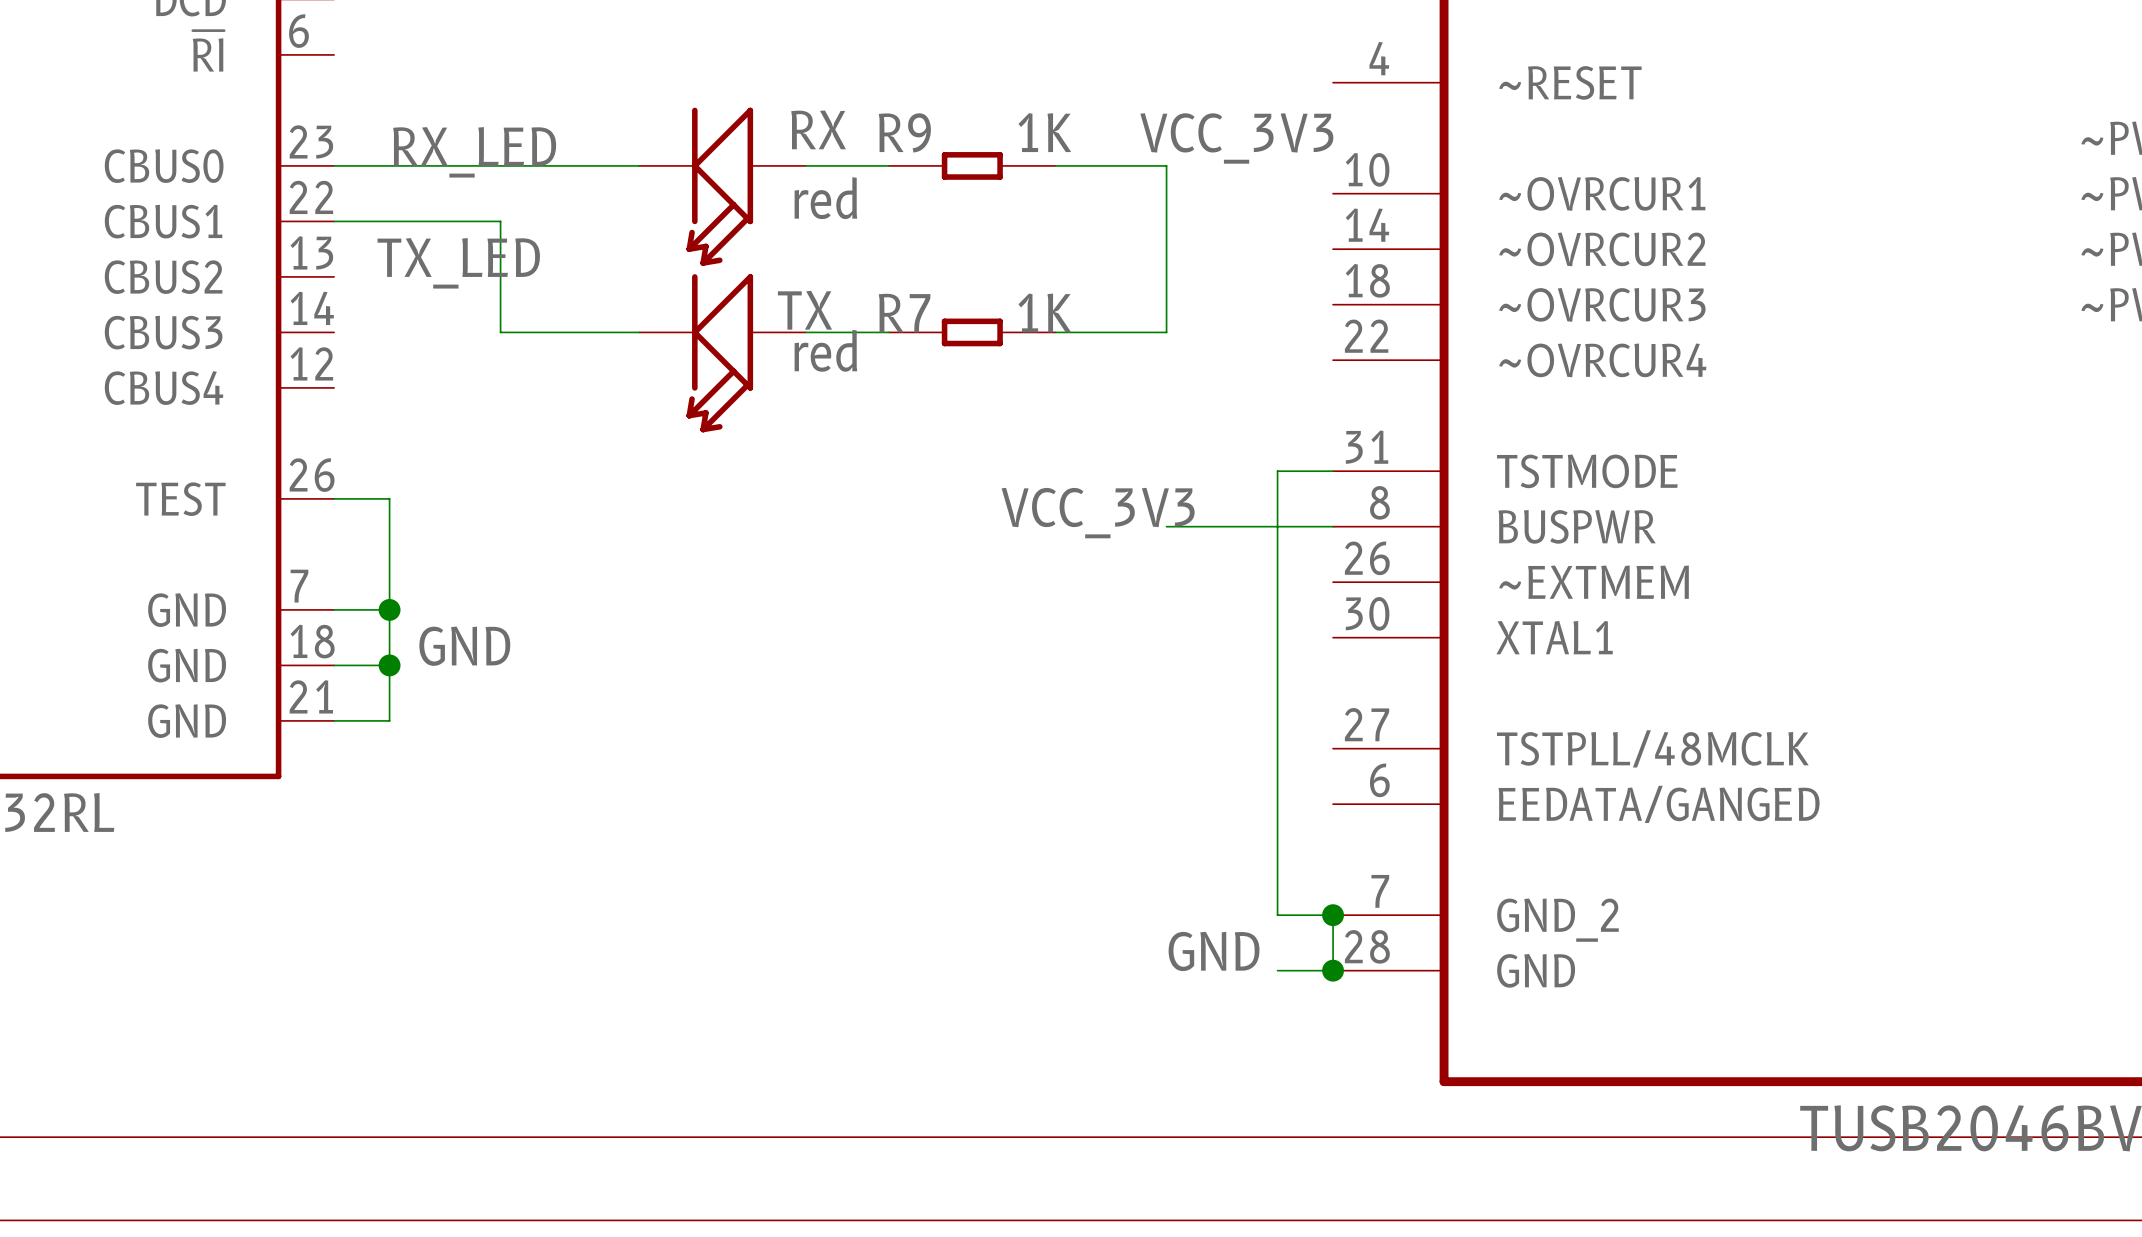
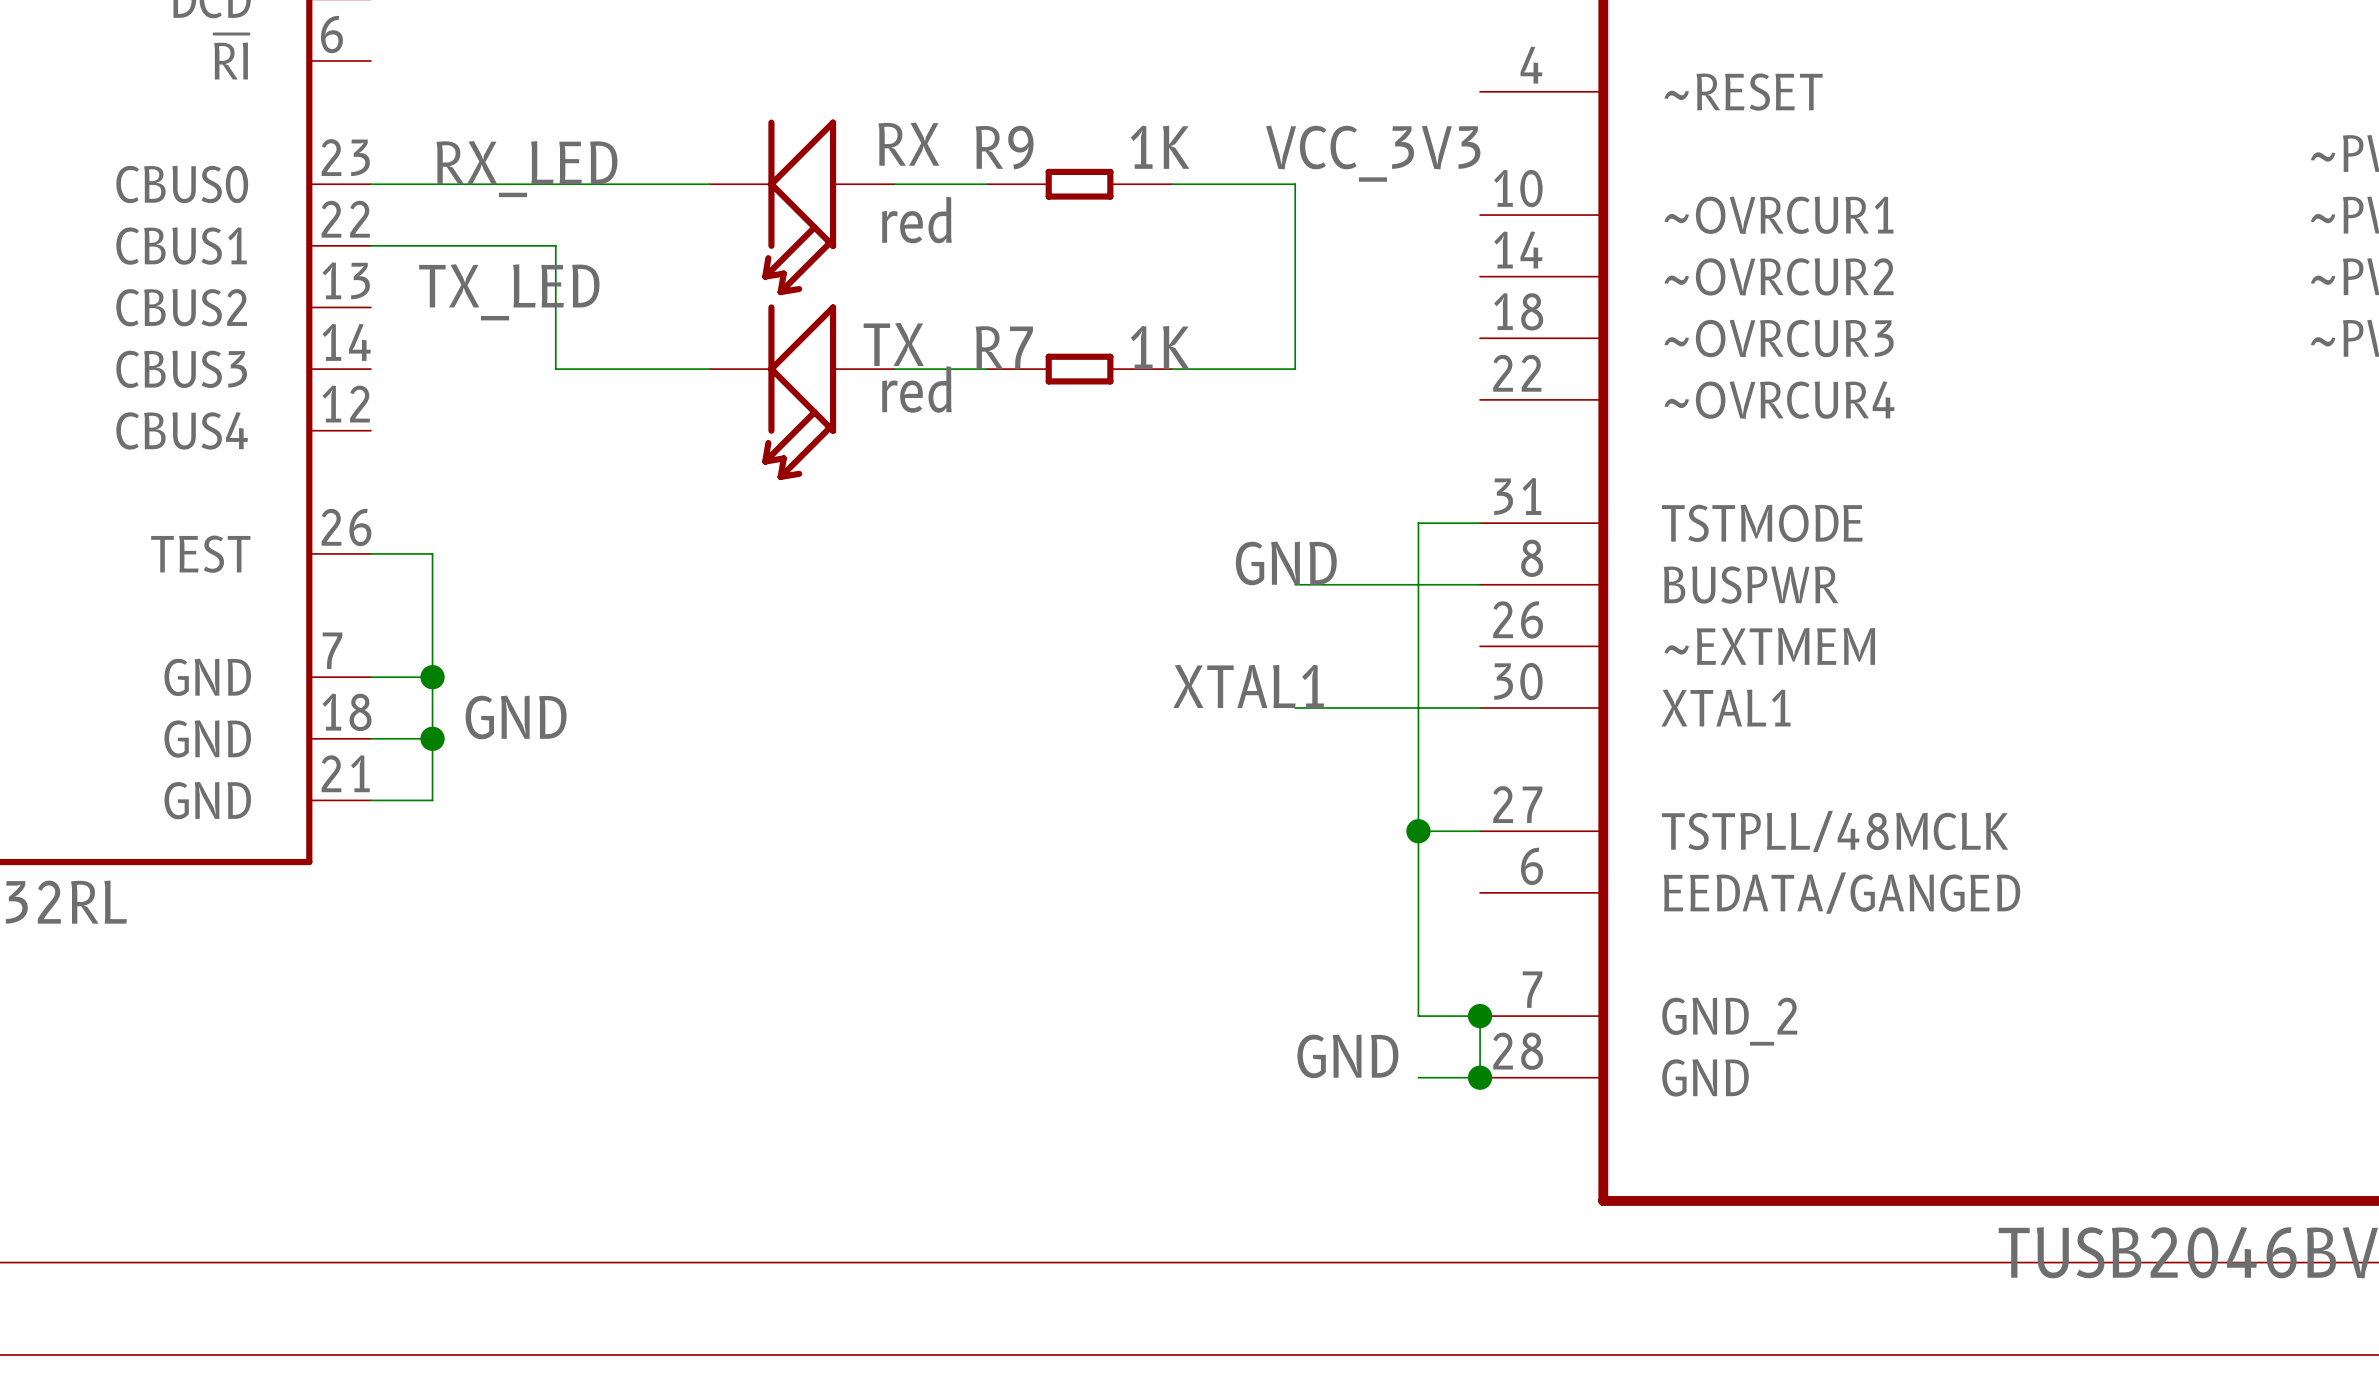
label: none -> GND (1286, 563)
label: VCC_3V3 (1098, 513) -> none
label: none -> XTAL1 (1248, 686)
wire: none -> (1295, 707) (1480, 707)
wire: none -> (1418, 831) (1480, 831)
junction: none -> (1418, 831)

